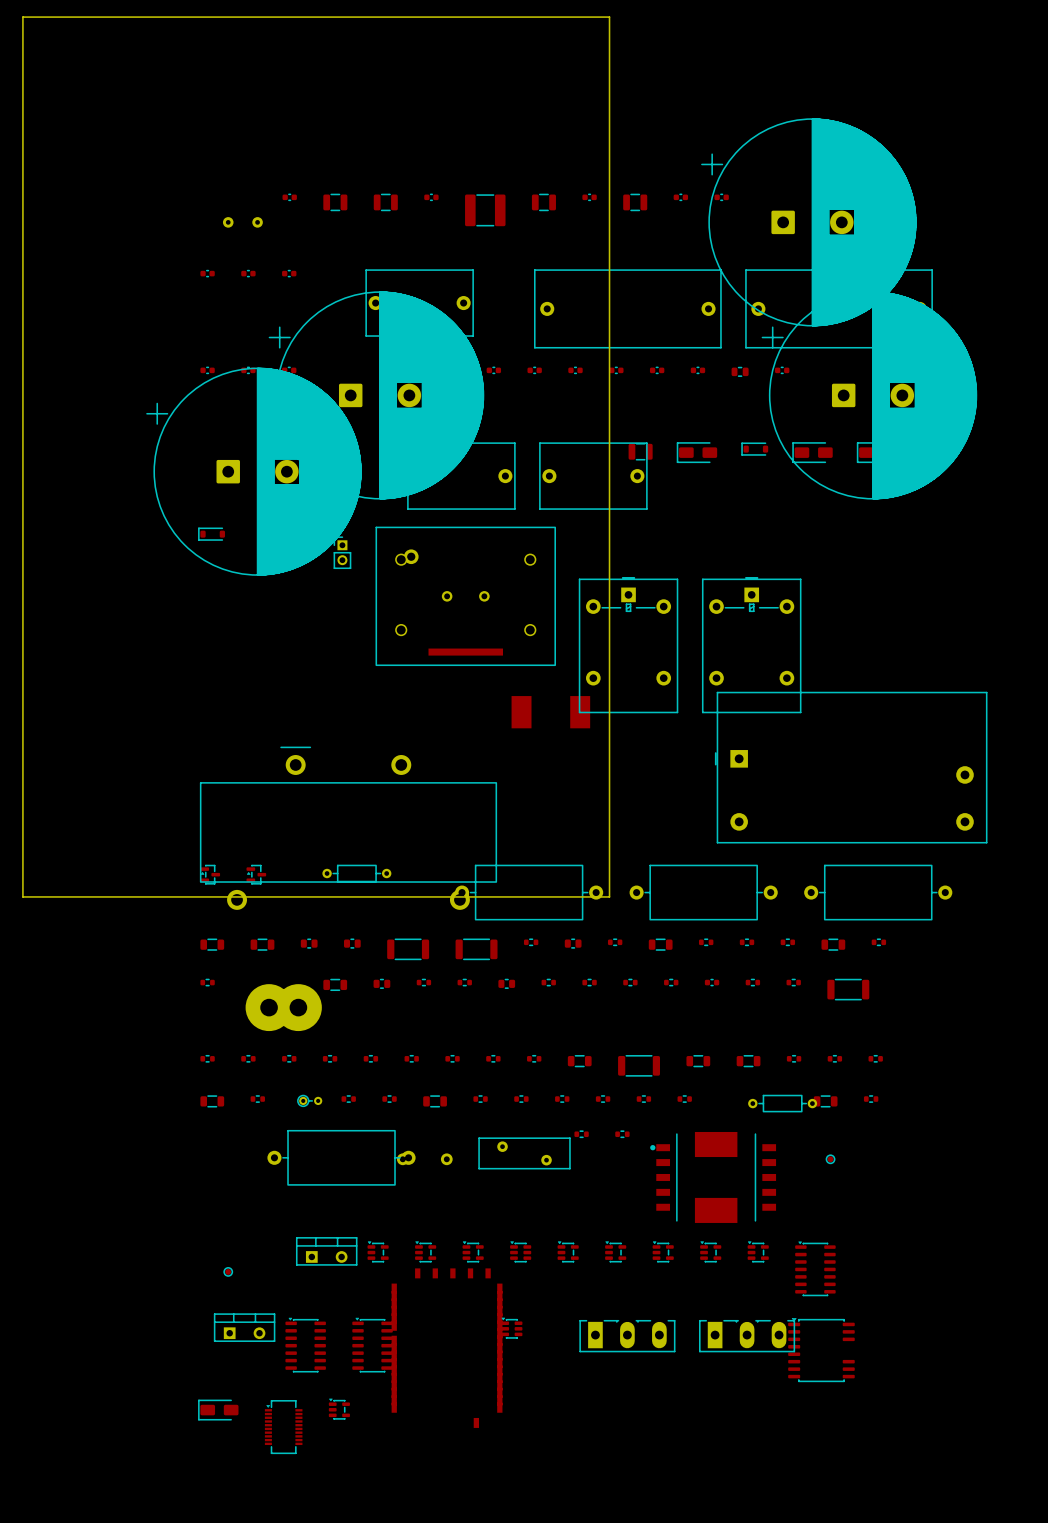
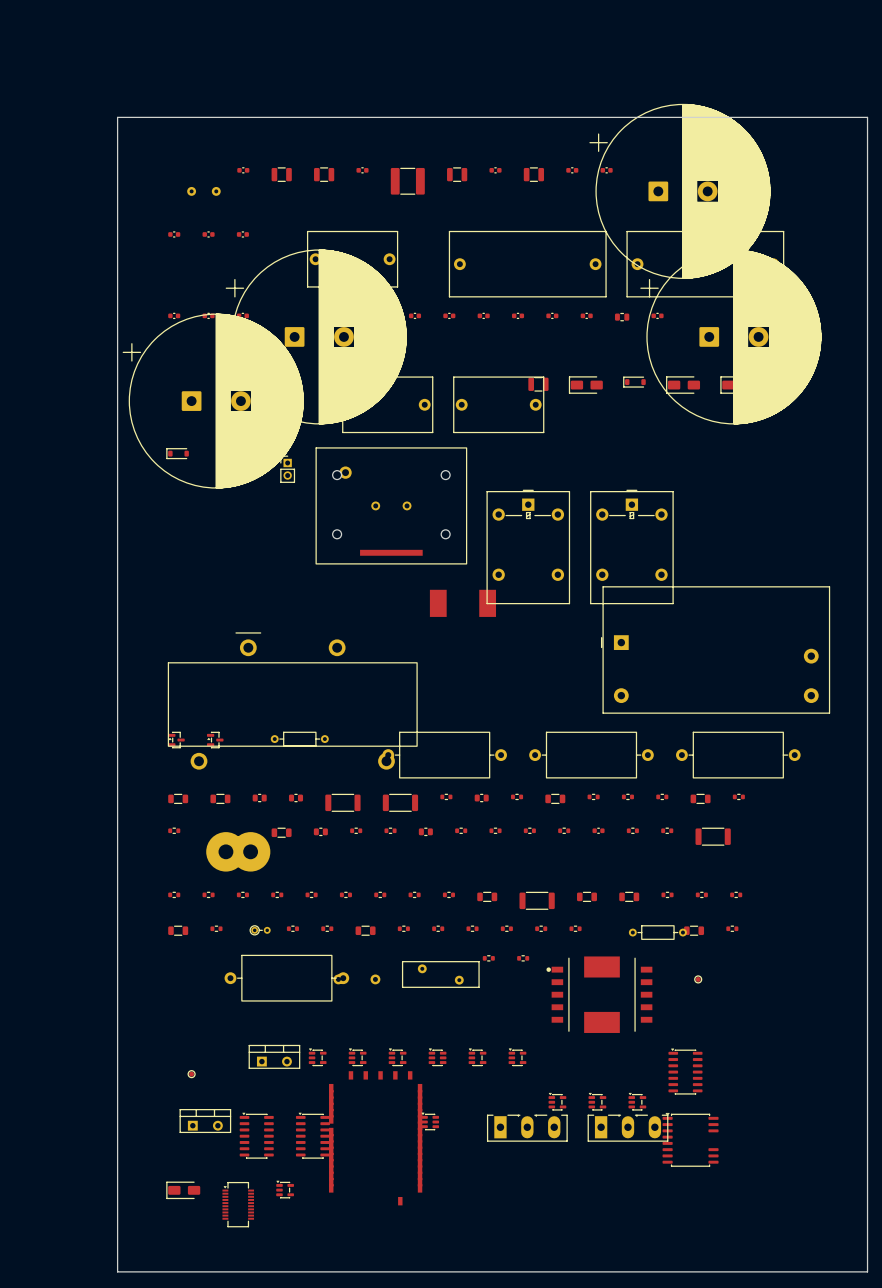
board edge: (22, 17) (609, 17) (609, 896) (22, 896) (22, 17) -> none
board edge: none -> (117, 117) (867, 117) (867, 1271) (117, 1271) (117, 117)
part: (663, 1251) -> none
part: (710, 1251) -> none
part: (758, 1251) -> none
part: none -> (557, 1101)
part: none -> (597, 1101)
part: none -> (637, 1101)

